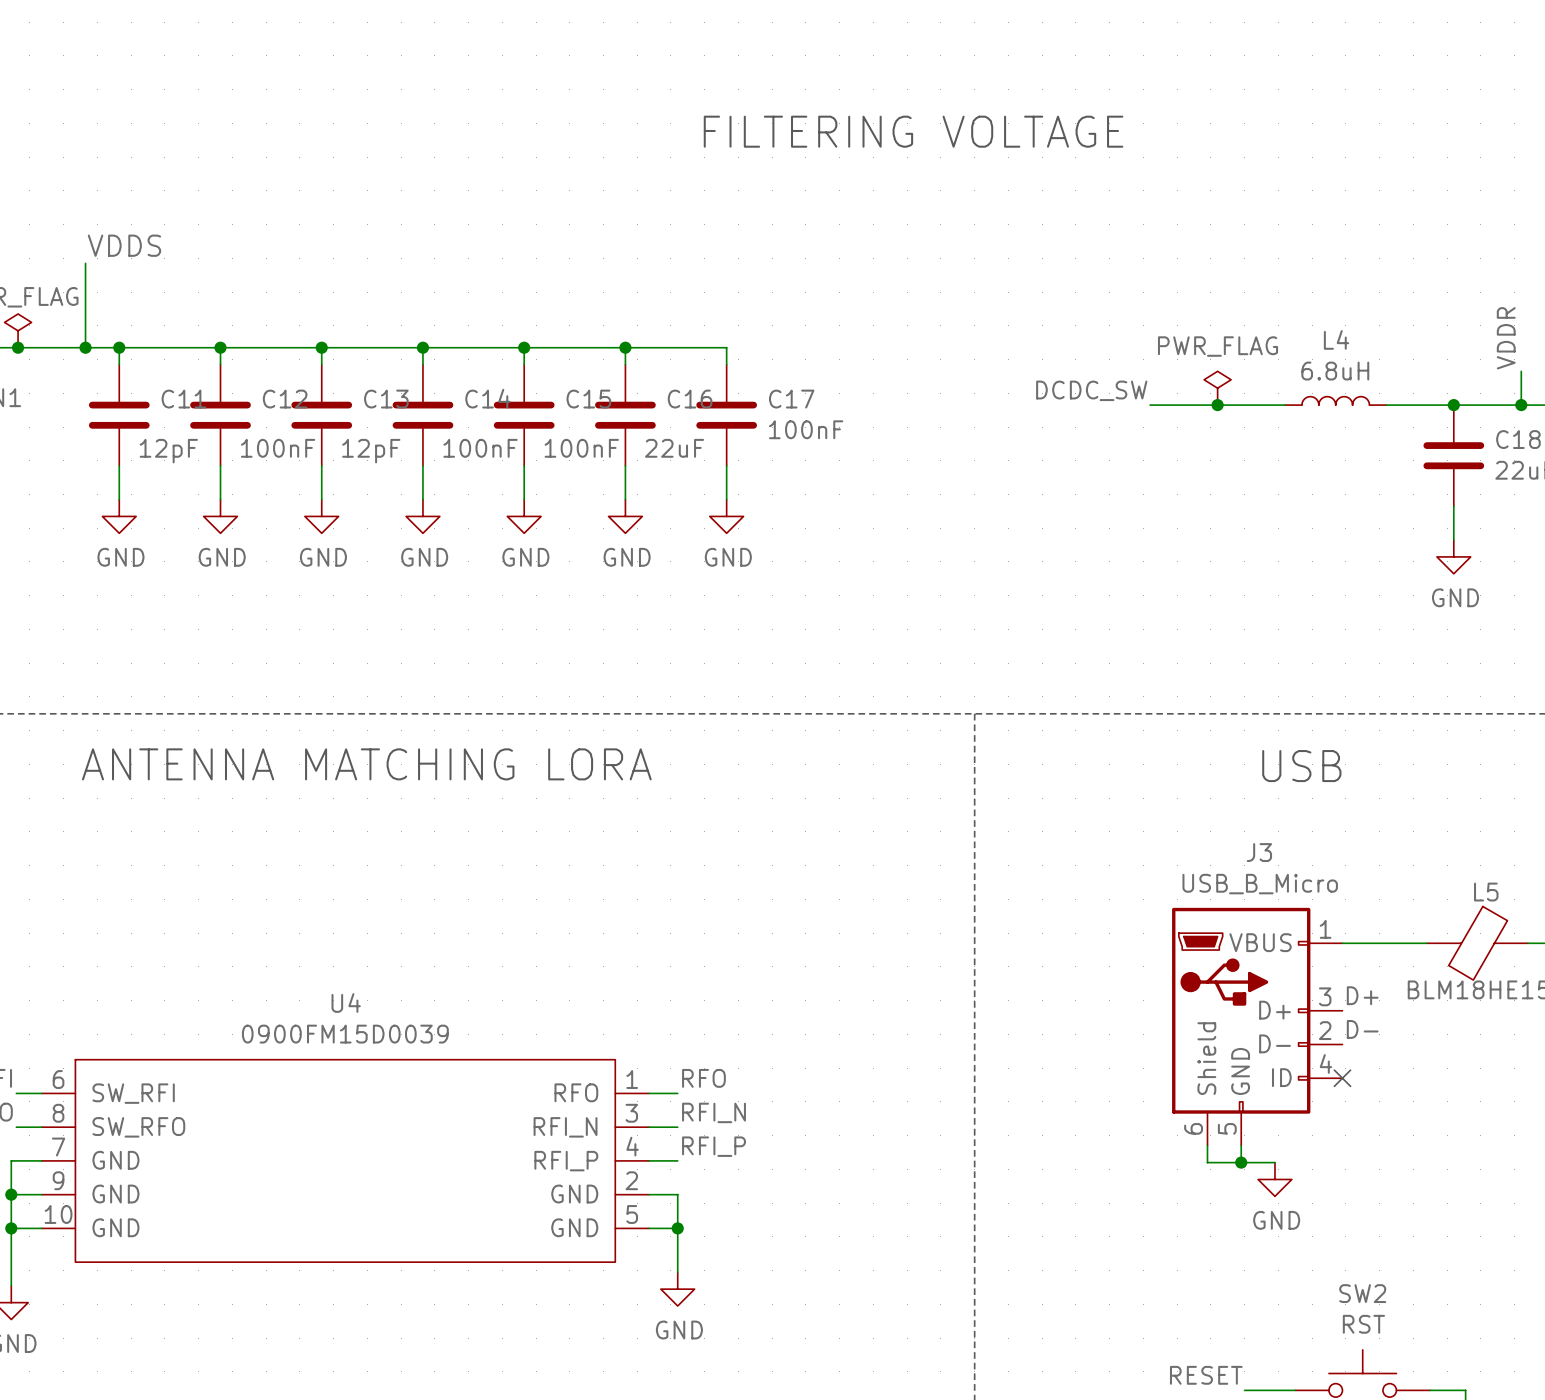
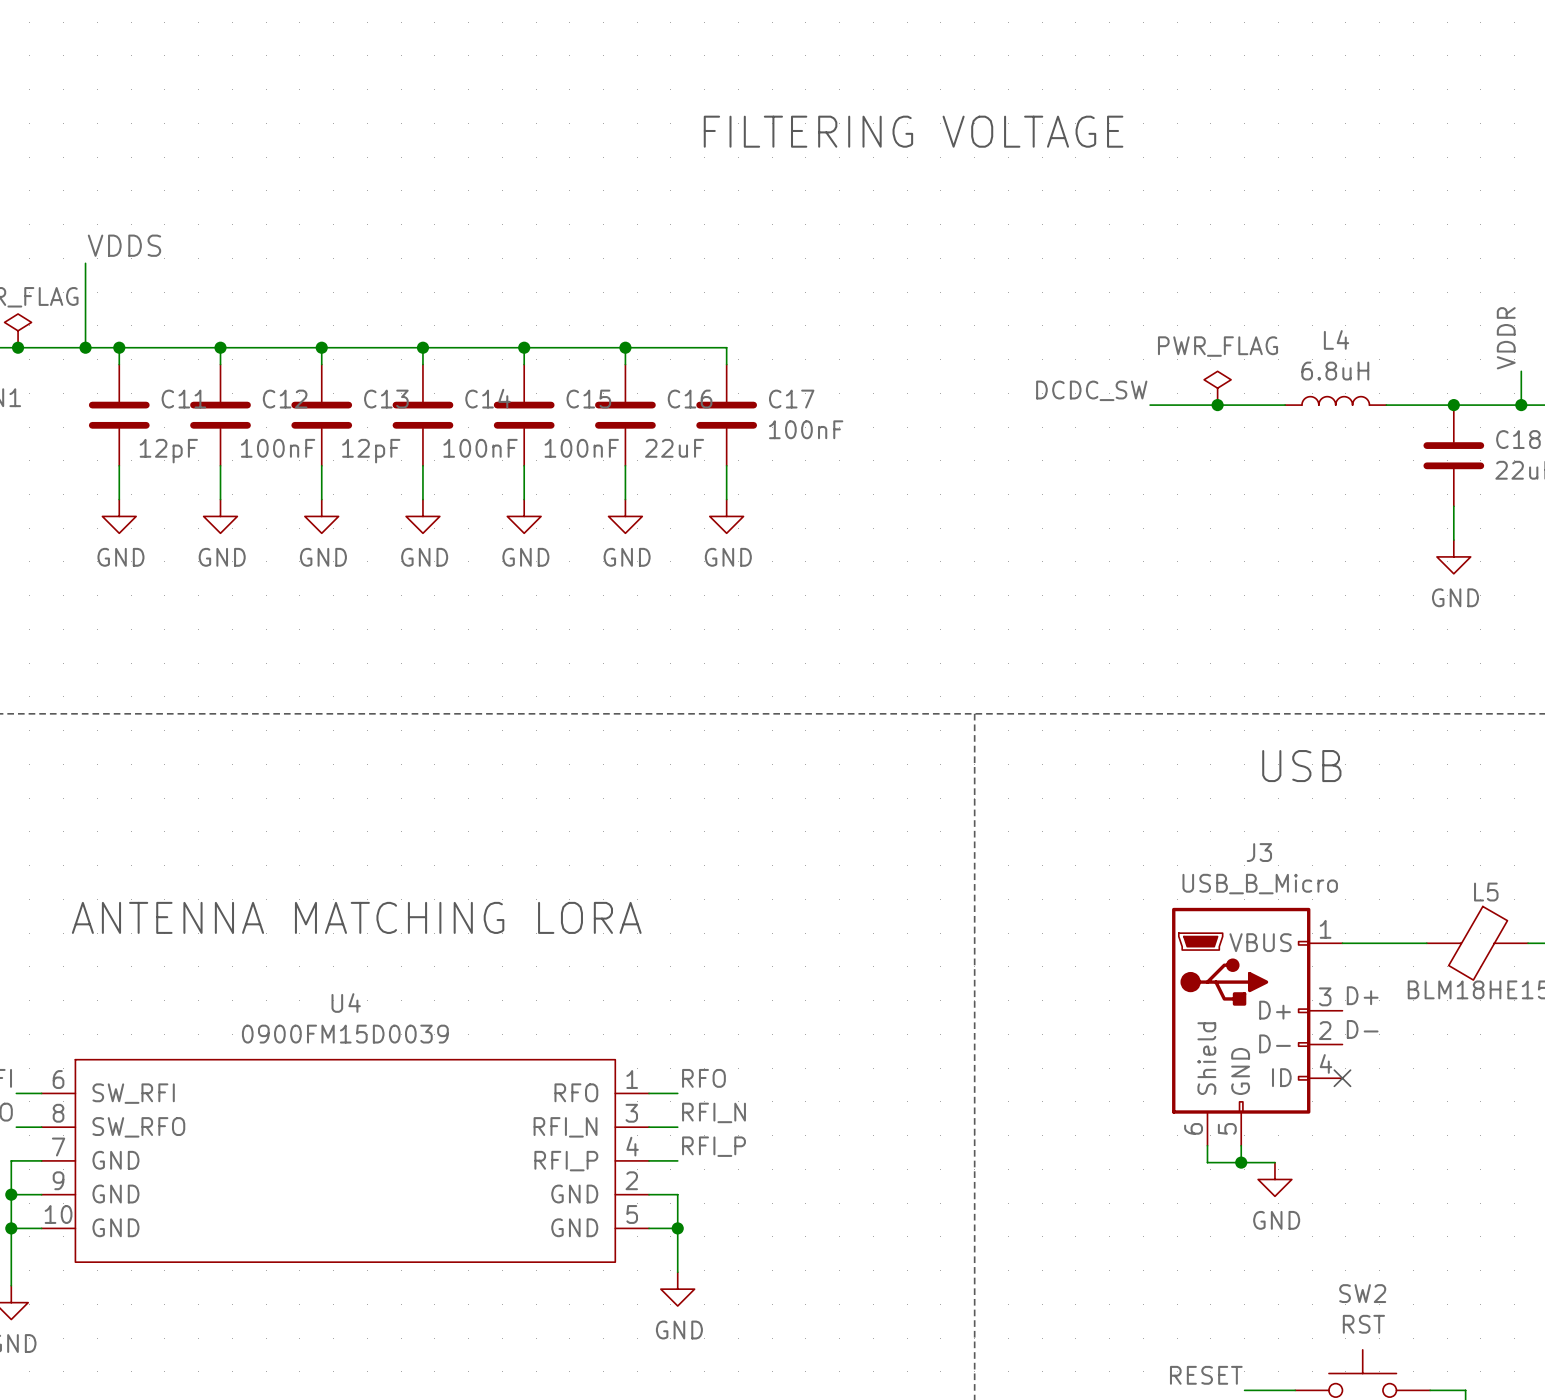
text position: ANTENNA MATCHING LORA (366, 764) -> ANTENNA MATCHING LORA (356, 917)

